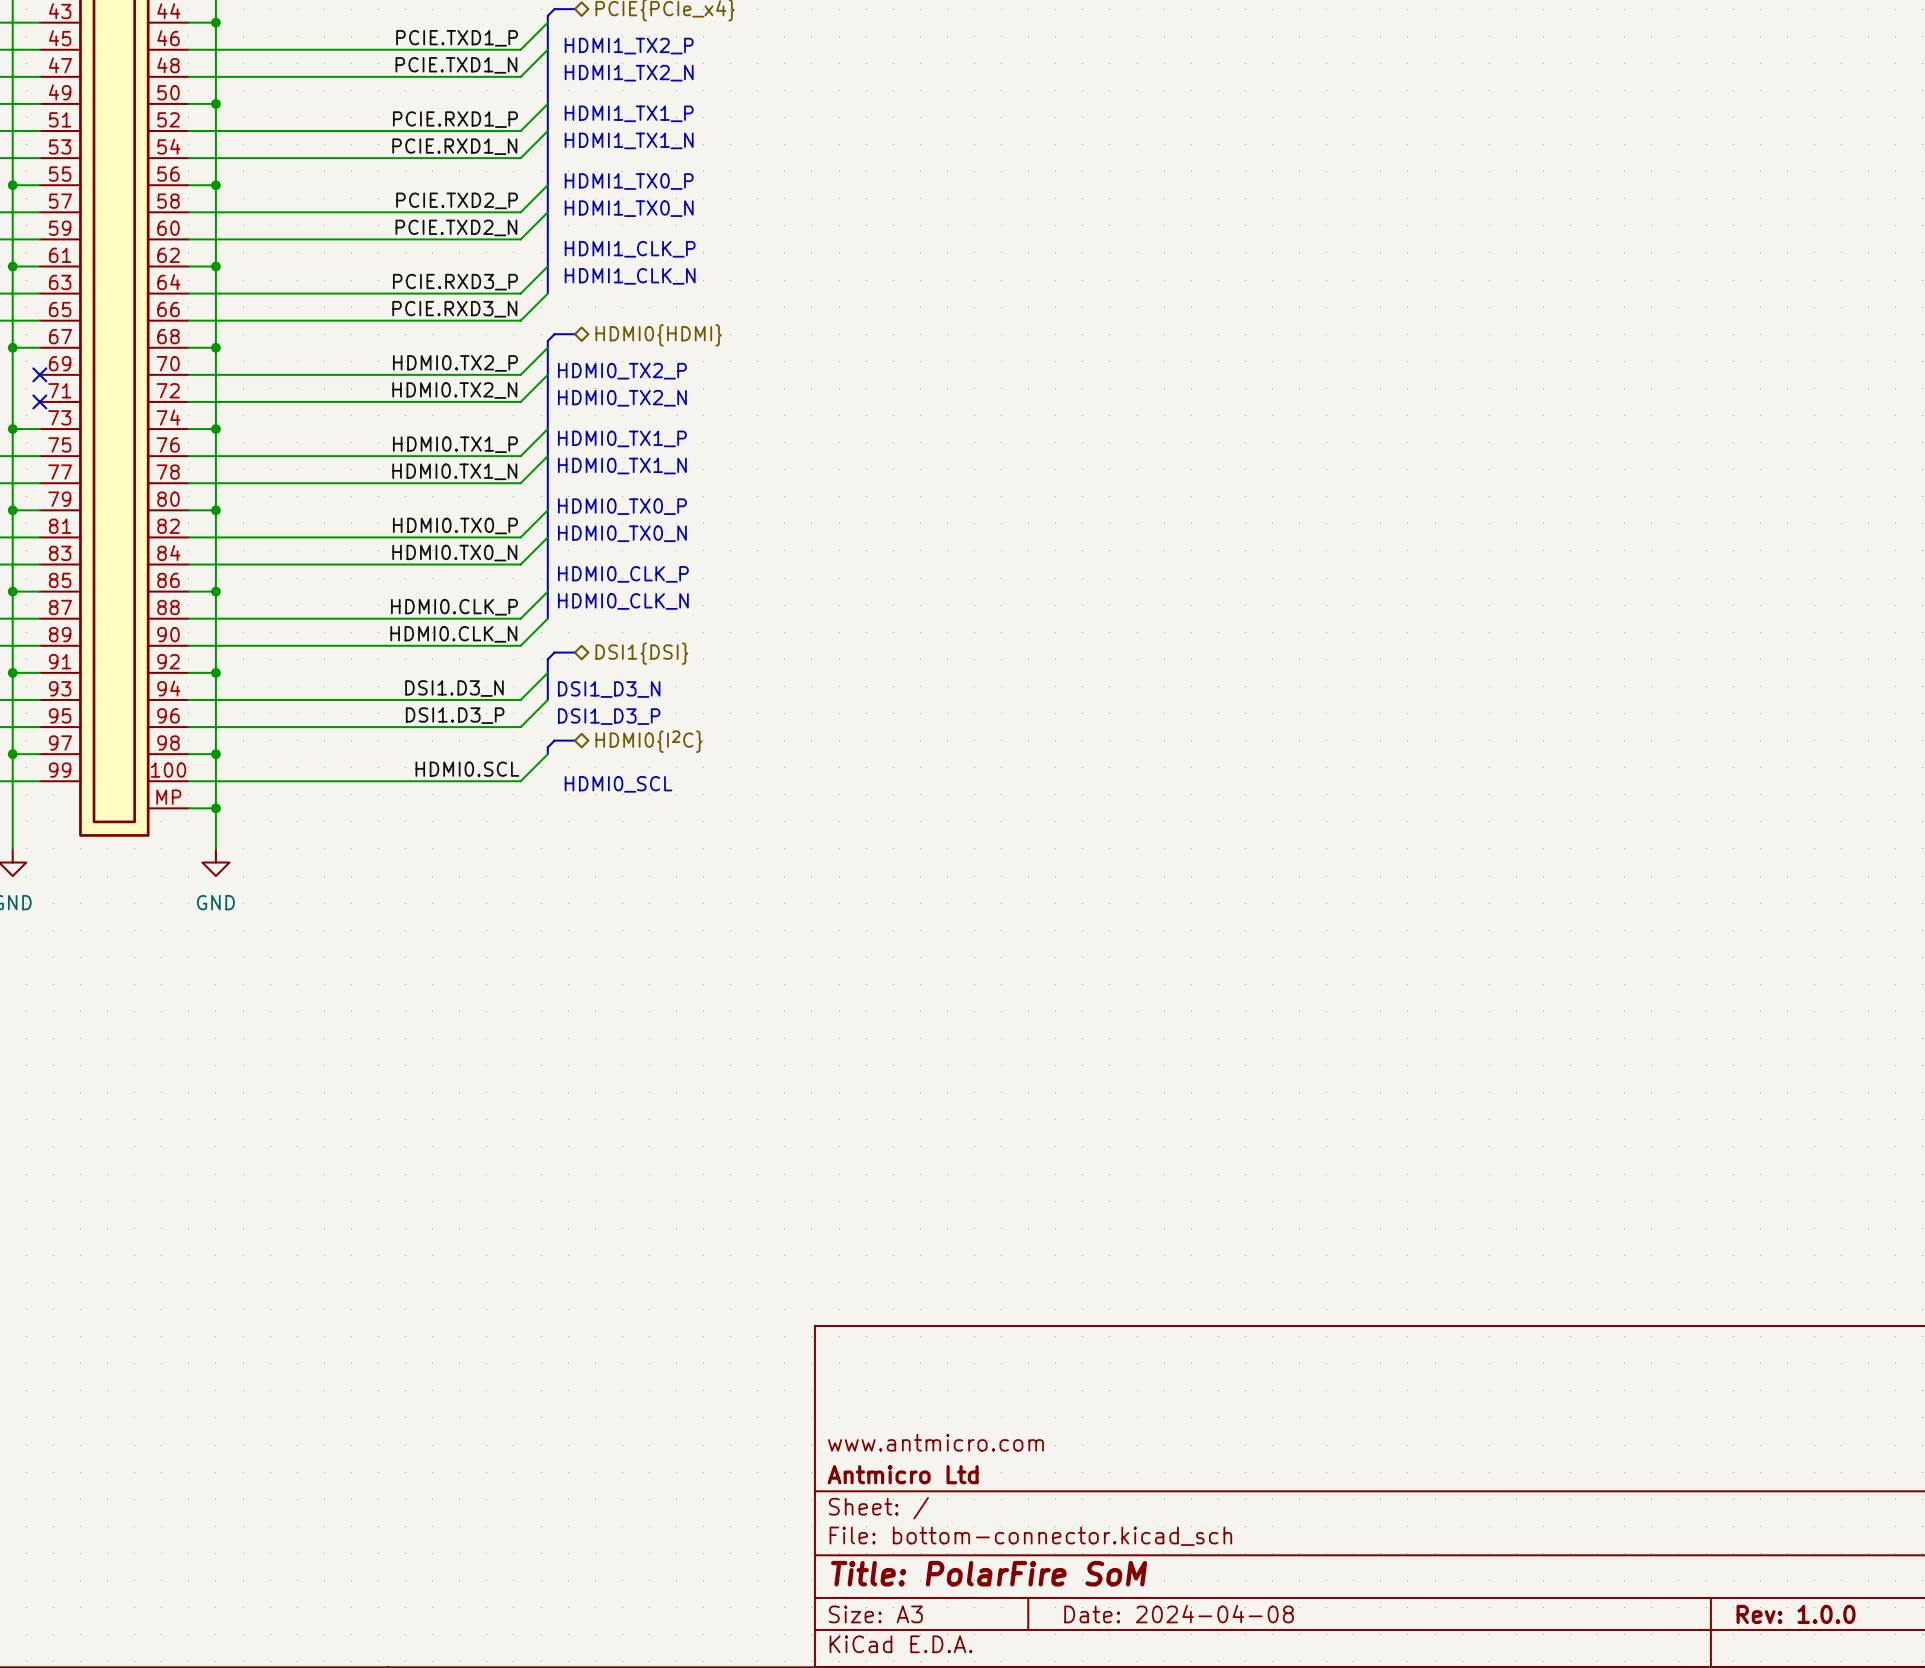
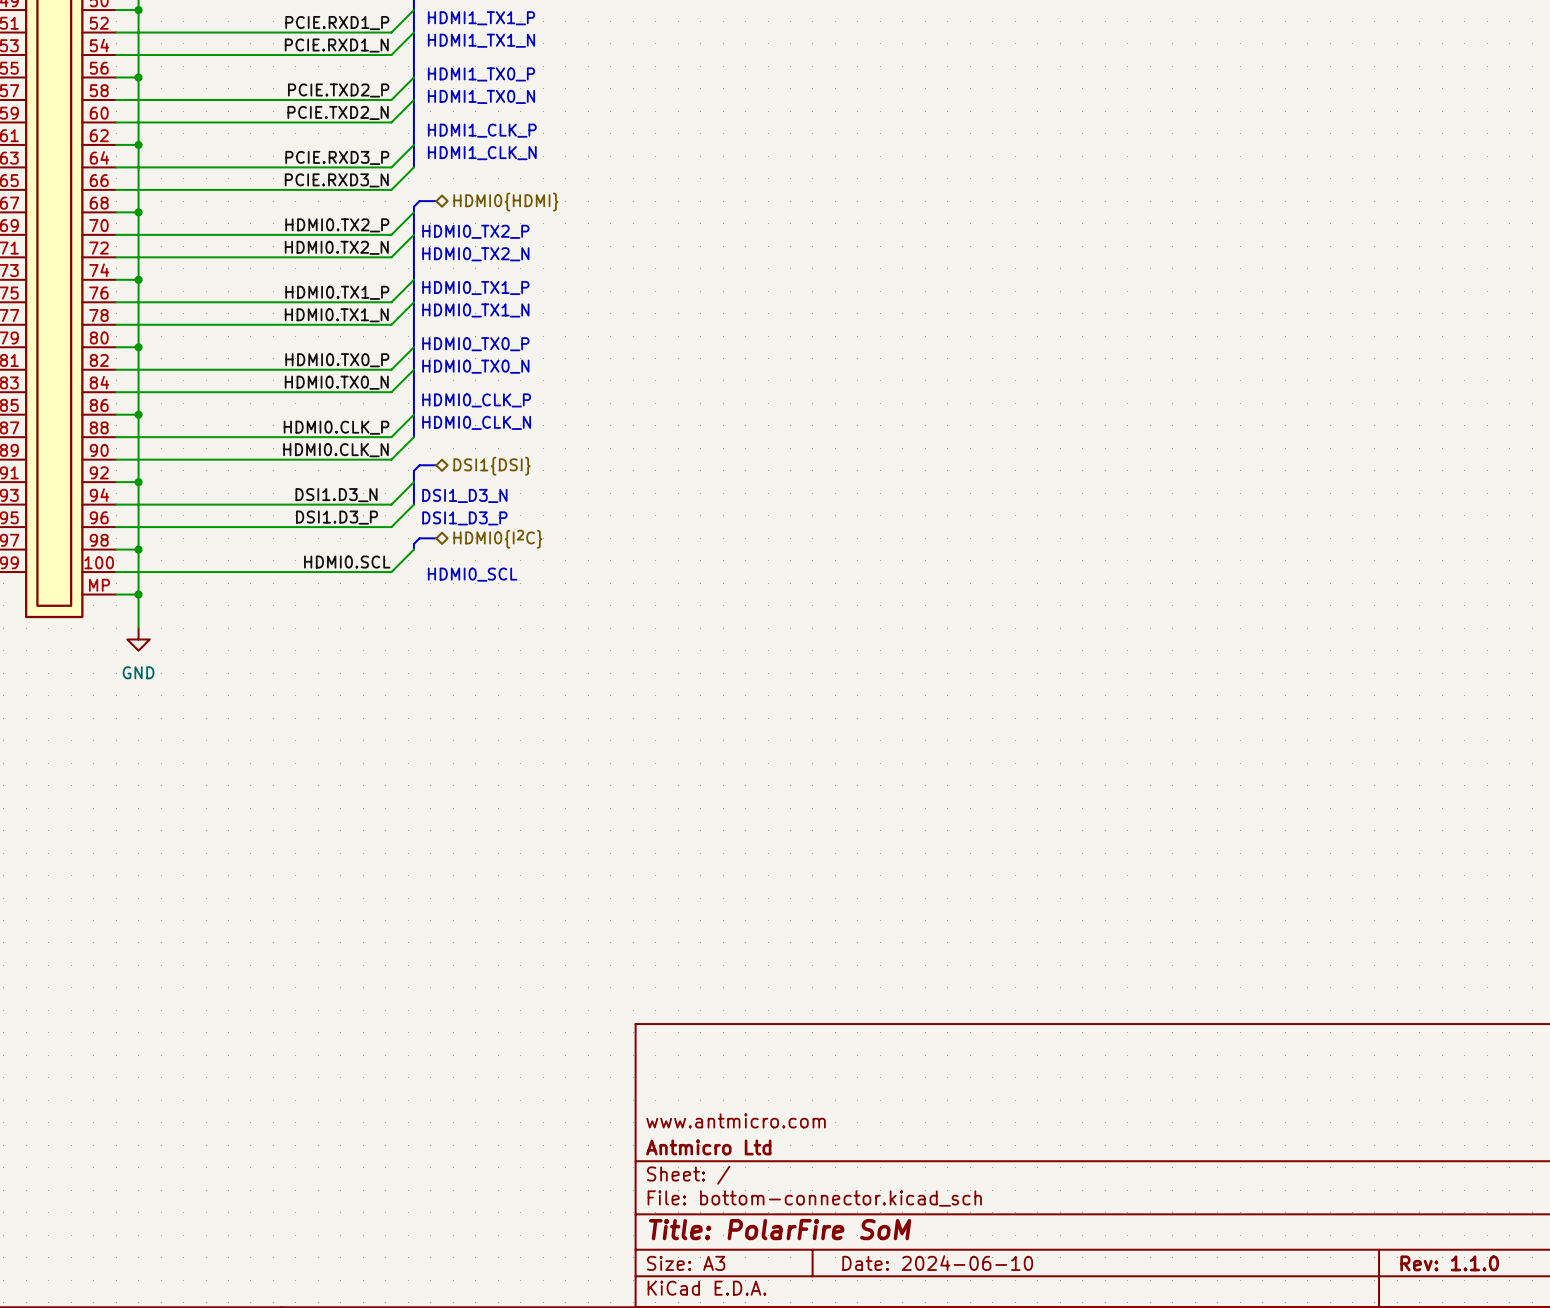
title block: Date: 2024-04-08 (1179, 1614) -> Date: 2024-06-10 (937, 1263)
title block: Rev: 1.0.0 (1796, 1614) -> Rev: 1.1.0 (1449, 1263)

